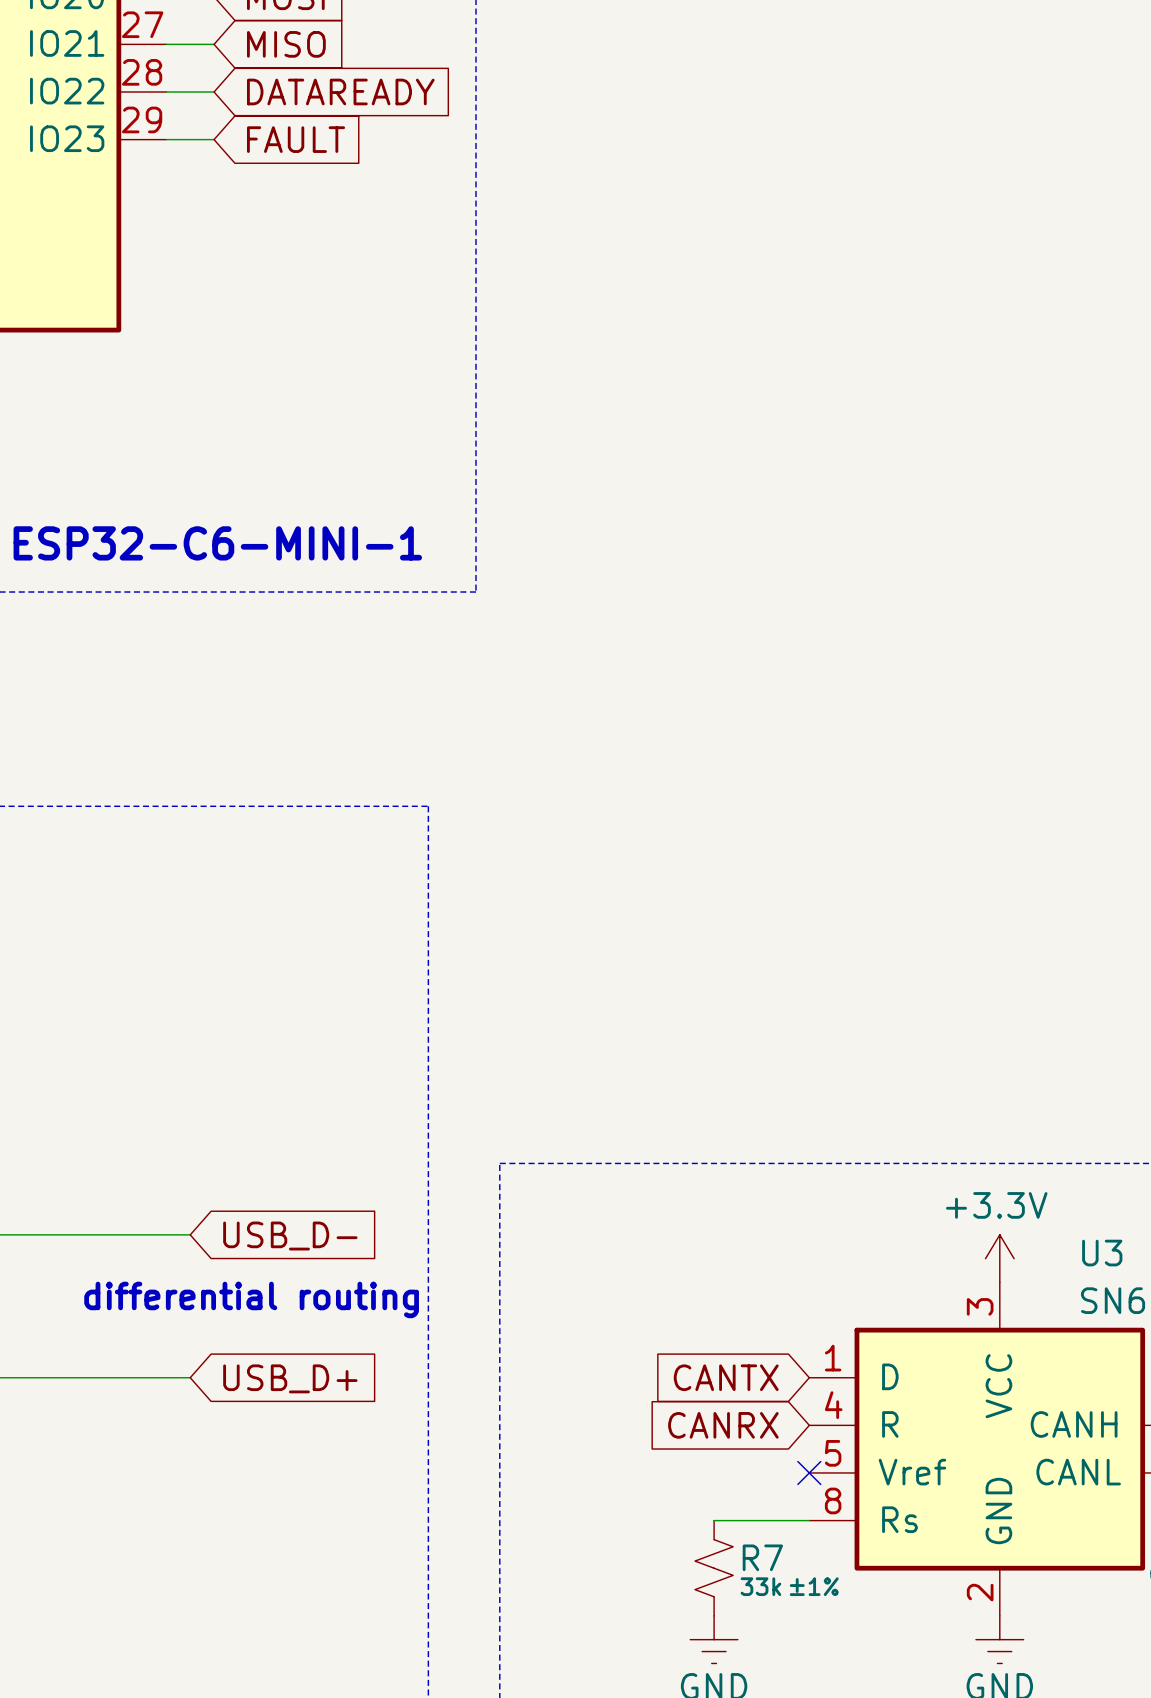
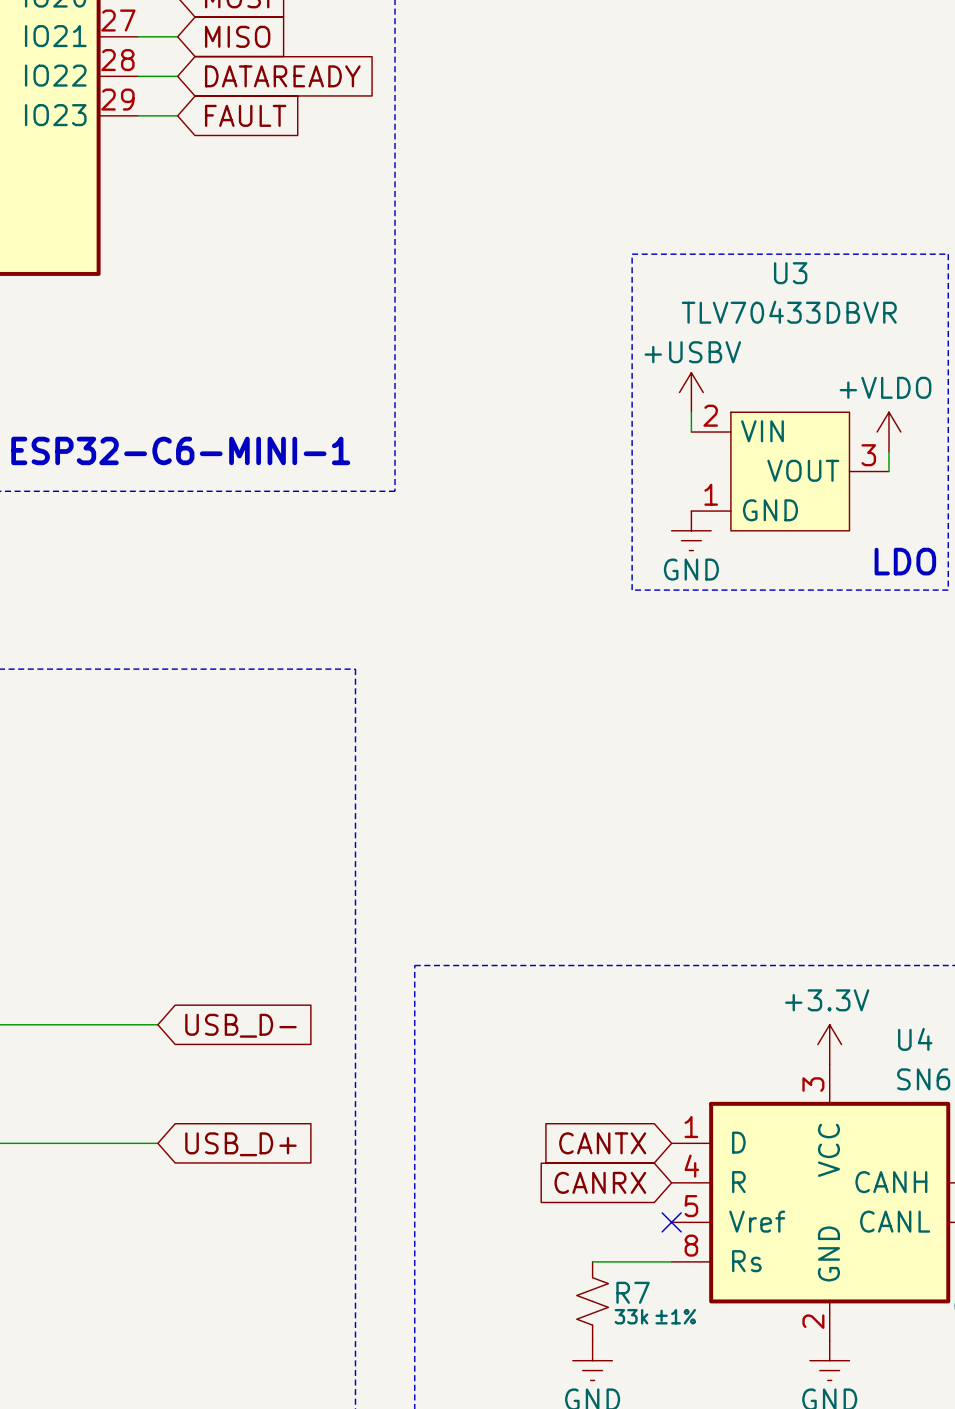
line: none -> (632, 254) (948, 254) (948, 590) (632, 590) (632, 254)
power symbol: none -> +USBV (691, 392)
wire: none -> (691, 412) (691, 432)
power symbol: none -> +VLDO (888, 432)
wire: none -> (888, 451) (888, 471)
U3: none -> TLV70433DBVR (790, 471)
power symbol: none -> GND (691, 530)
text: none -> LDO (905, 561)
U3 name: U3 (1102, 1253) -> U4 (915, 1039)
text: differential routing (251, 1299) -> none

